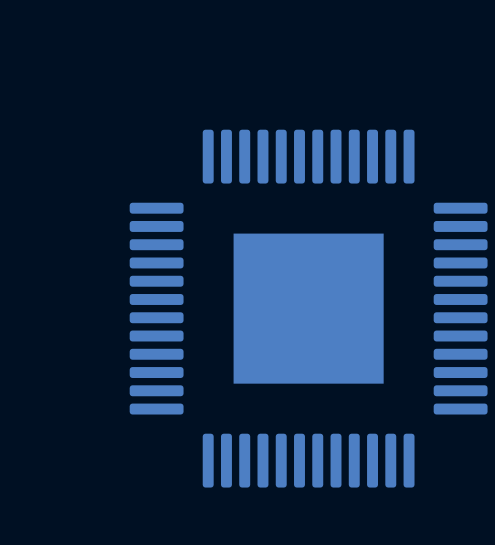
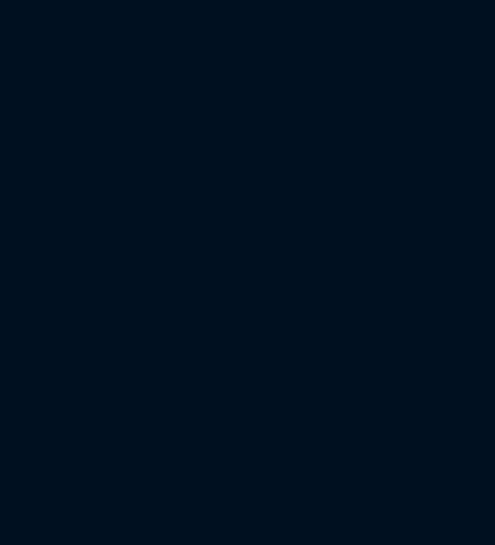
part: (308, 308) -> none

